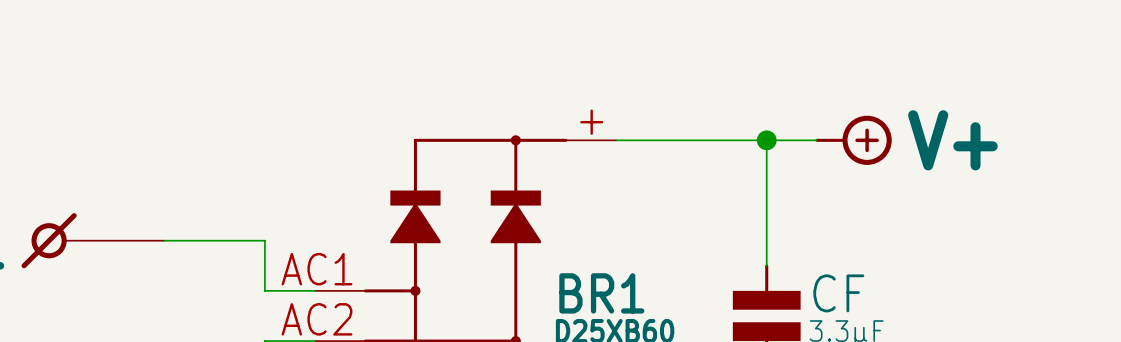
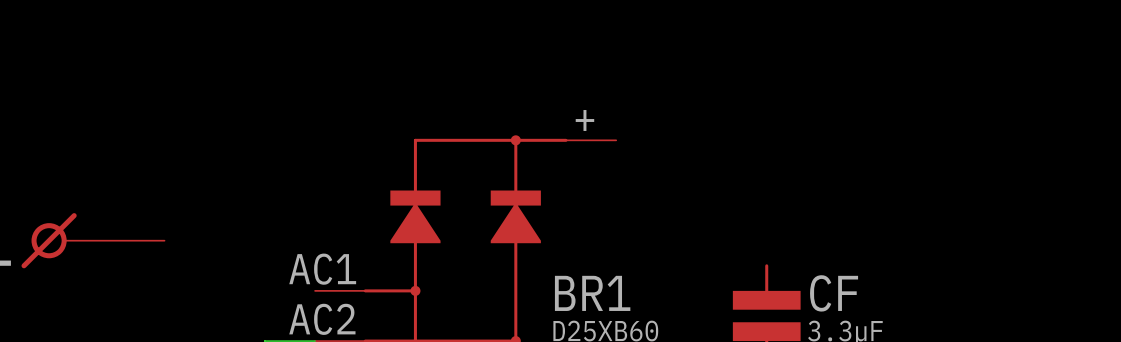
wire: (616, 140) (816, 140) -> none
wire: (766, 140) (766, 265) -> none
junction: (766, 140) -> none
power symbol: V+ (853, 140) -> none
wire: (164, 240) (264, 240) (264, 290) (315, 290) -> none

